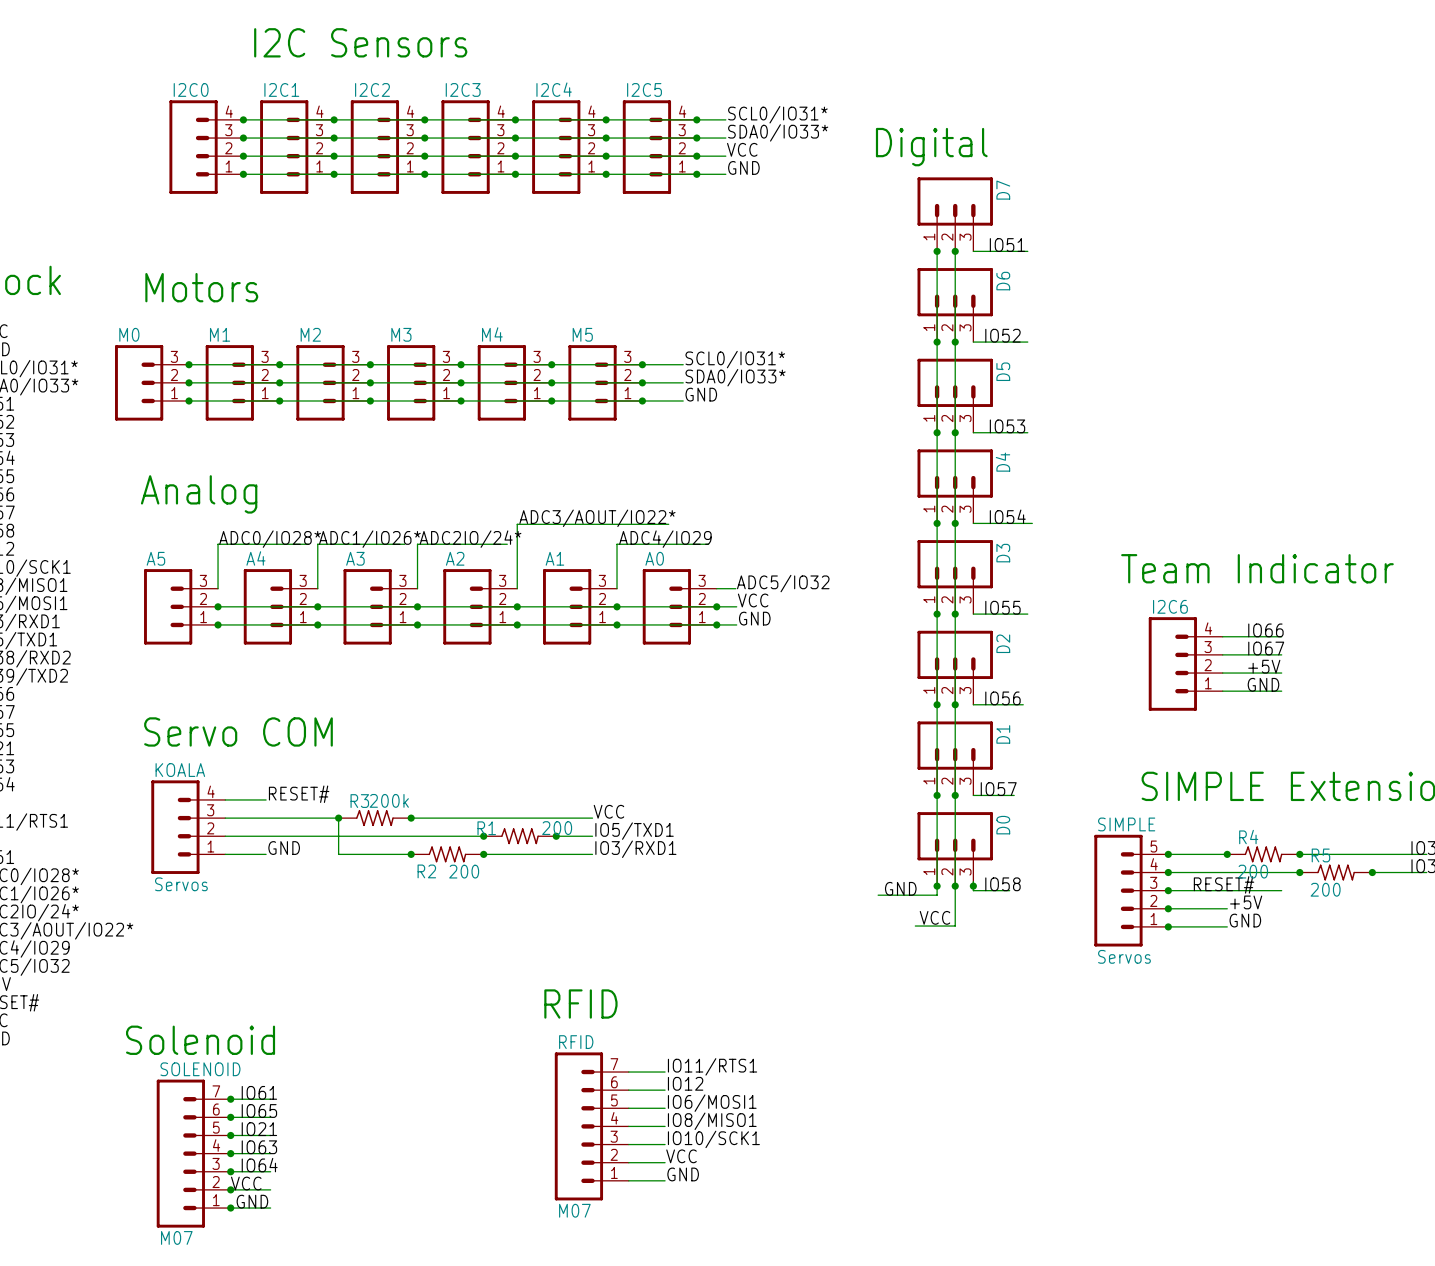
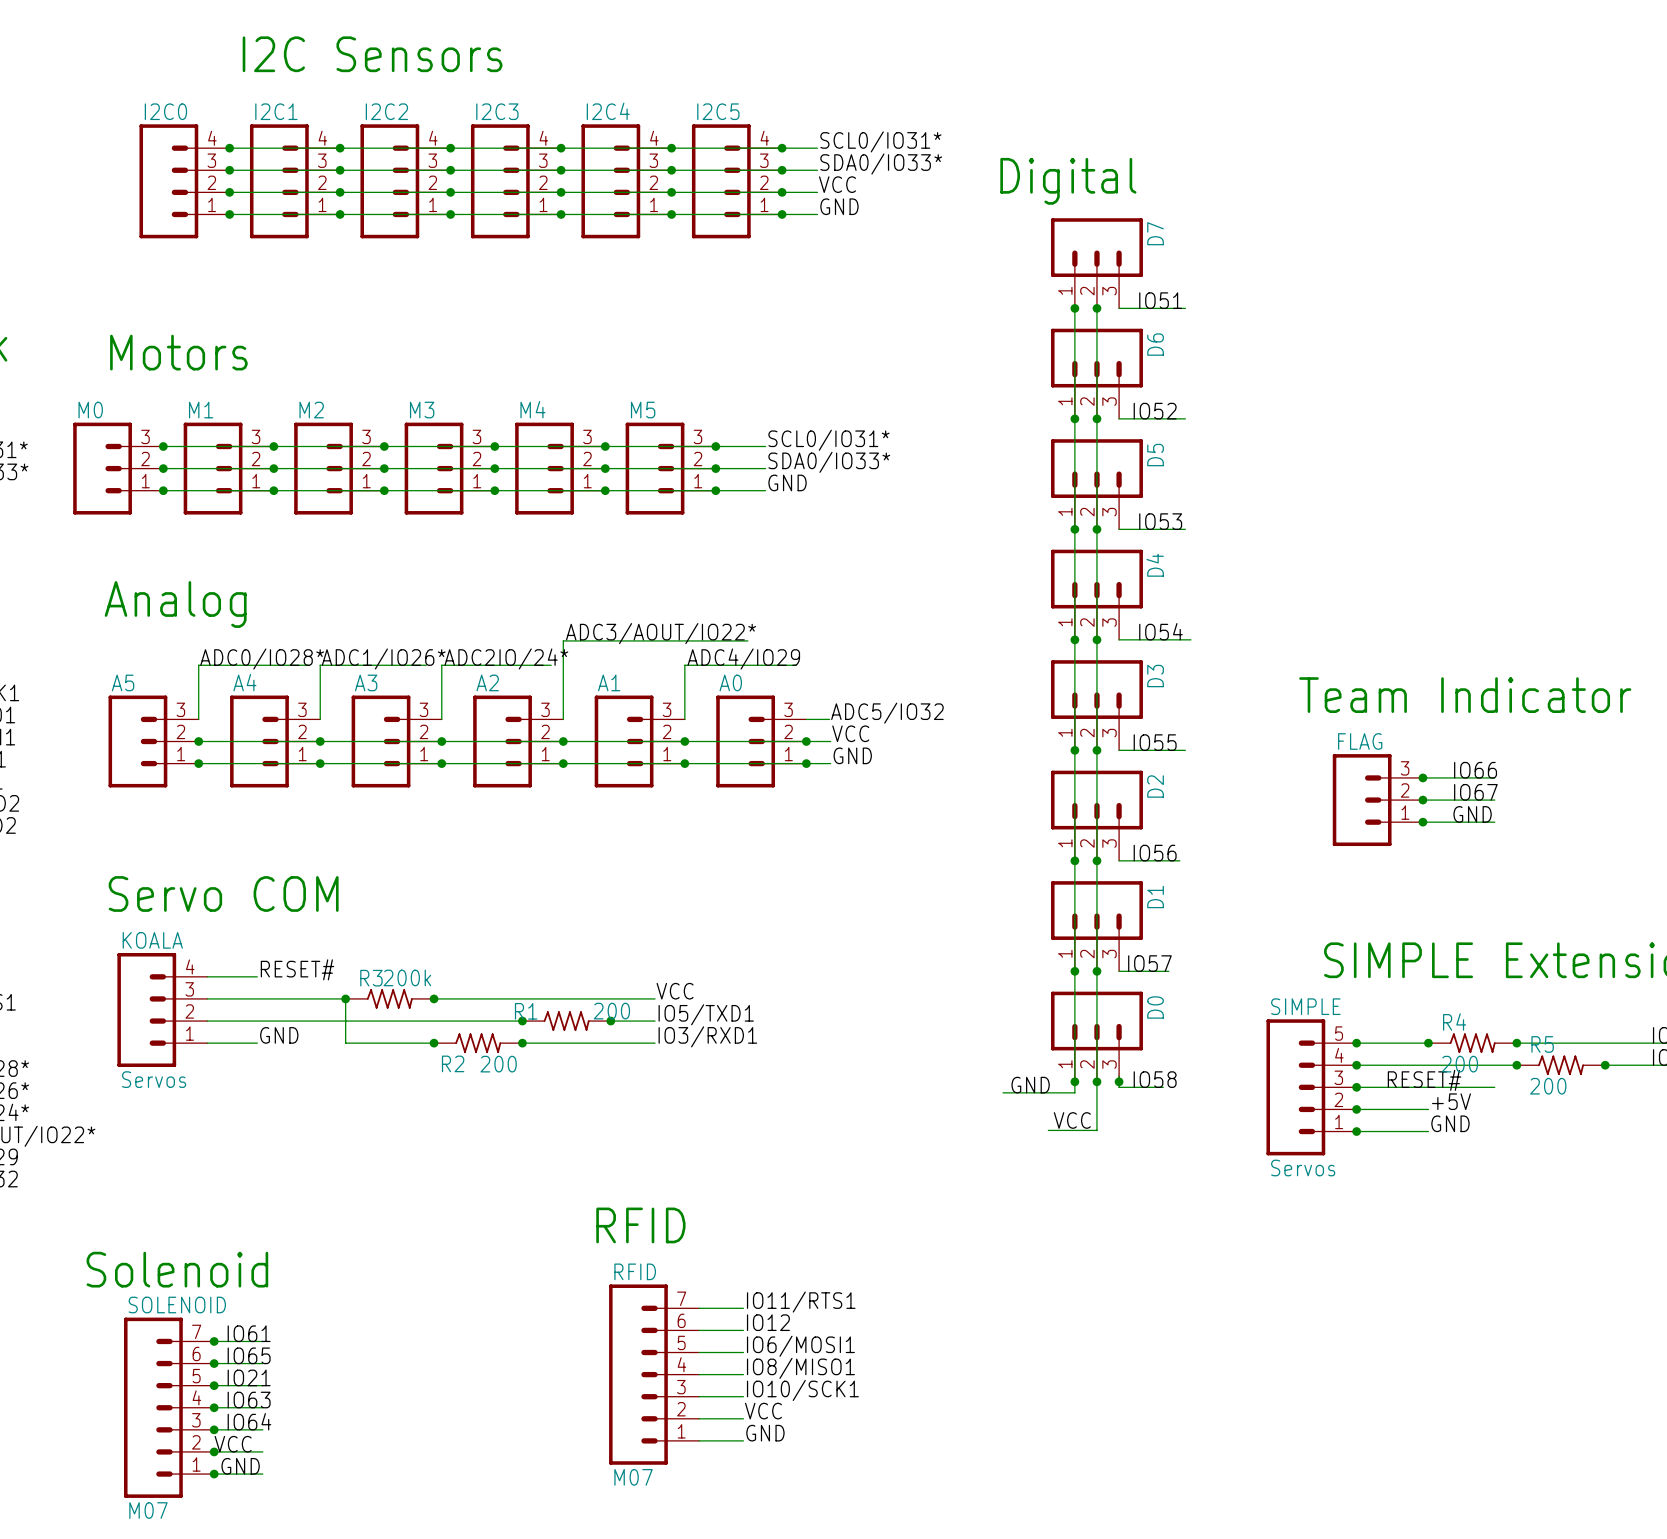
junction: none -> (1422, 777)
FLAG: none -> (1377, 800)
junction: none -> (1422, 800)
I2C6: (1185, 663) -> none
label: +5V (1264, 666) -> GND (1472, 814)
junction: none -> (1422, 822)
label: GND (1263, 684) -> none
wire: (1222, 691) (1281, 691) -> none

